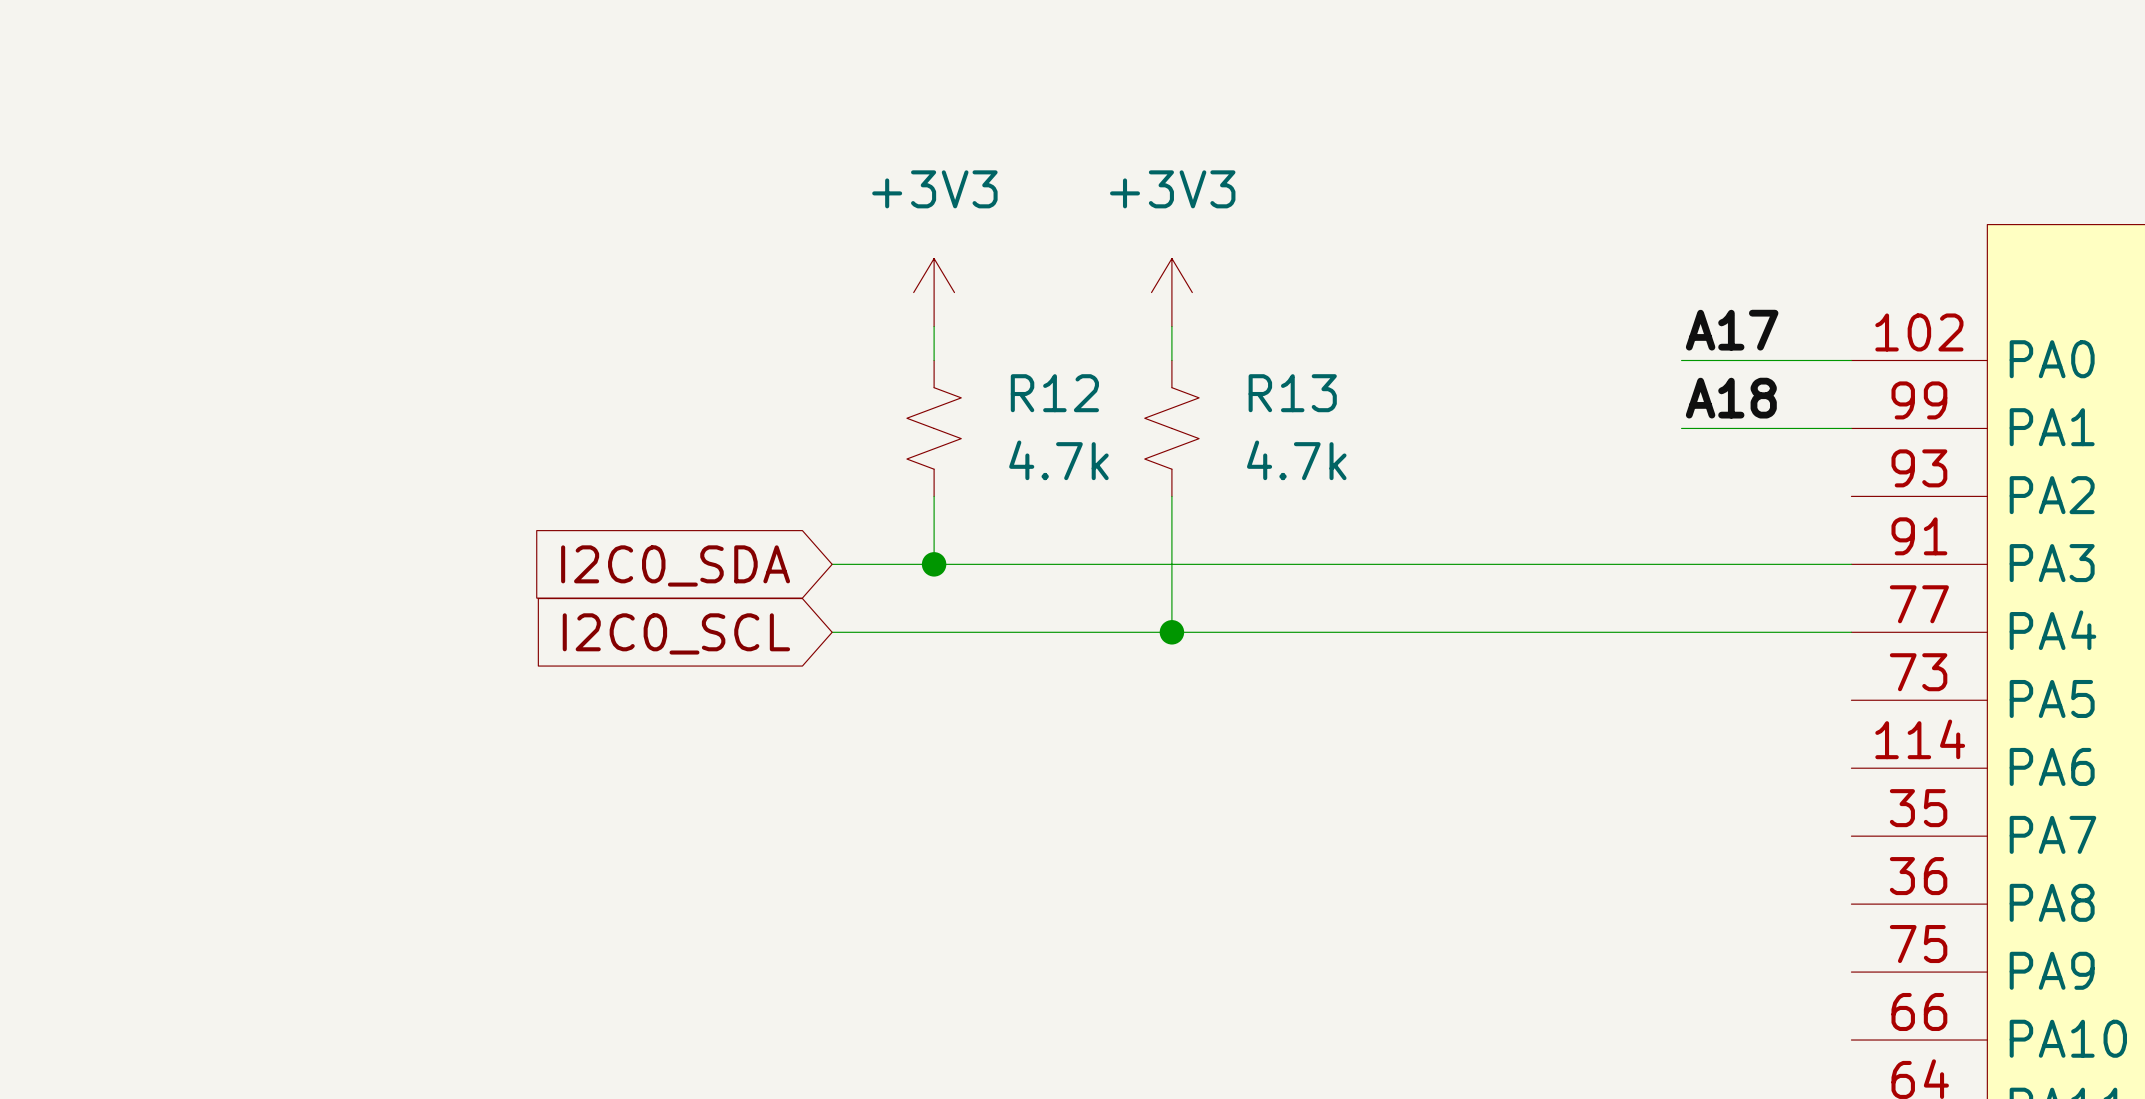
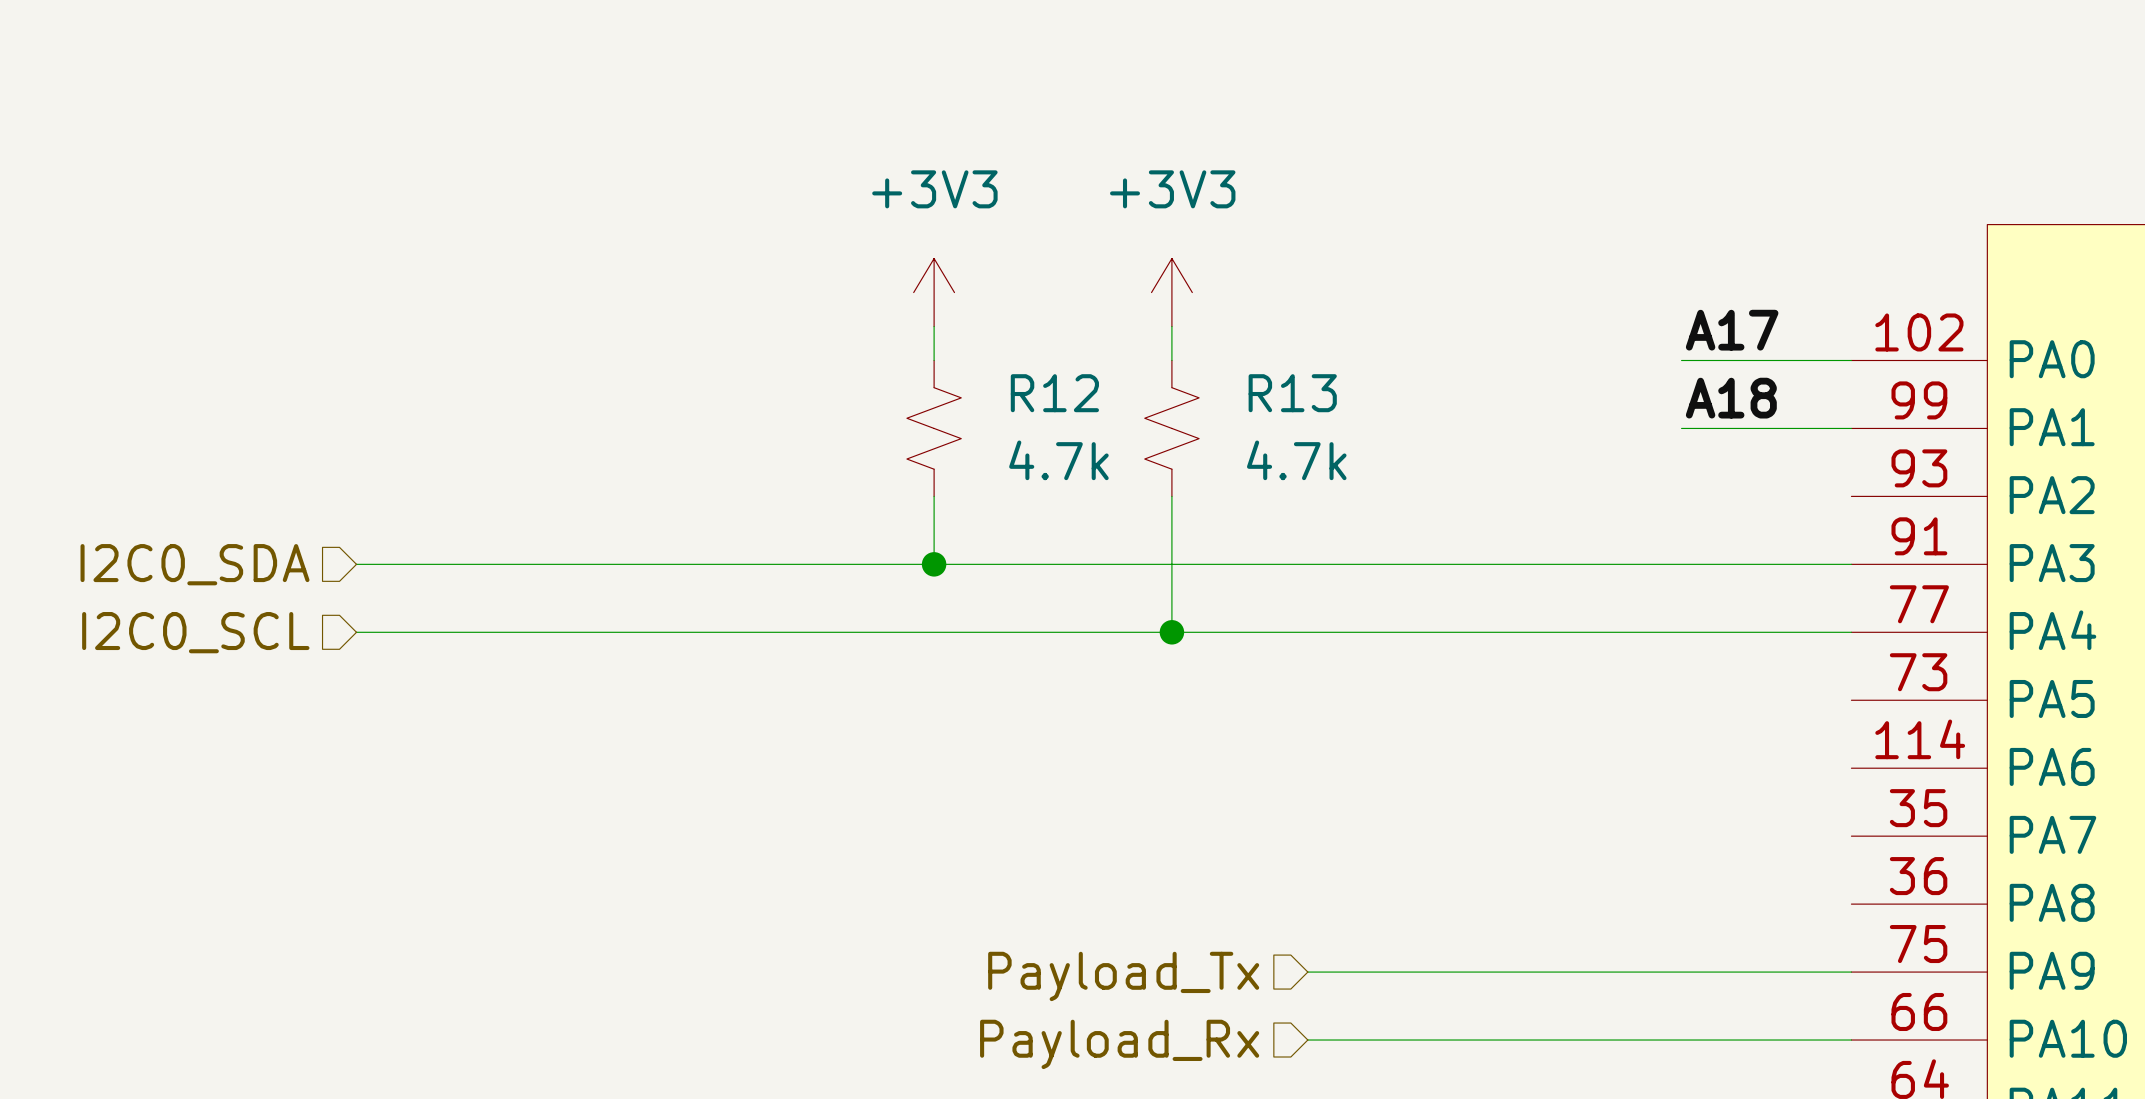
hierarchical label: none -> I2C0_SDA (194, 564)
wire: none -> (356, 564) (832, 564)
global label: I2C0_SDA (675, 565) -> none
hierarchical label: none -> I2C0_SCL (195, 632)
wire: none -> (356, 632) (832, 632)
global label: I2C0_SCL (676, 633) -> none
wire: none -> (1307, 972) (1851, 972)
hierarchical label: none -> Payload_Tx (1123, 976)
wire: none -> (1307, 1040) (1851, 1040)
hierarchical label: none -> Payload_Rx (1119, 1044)

